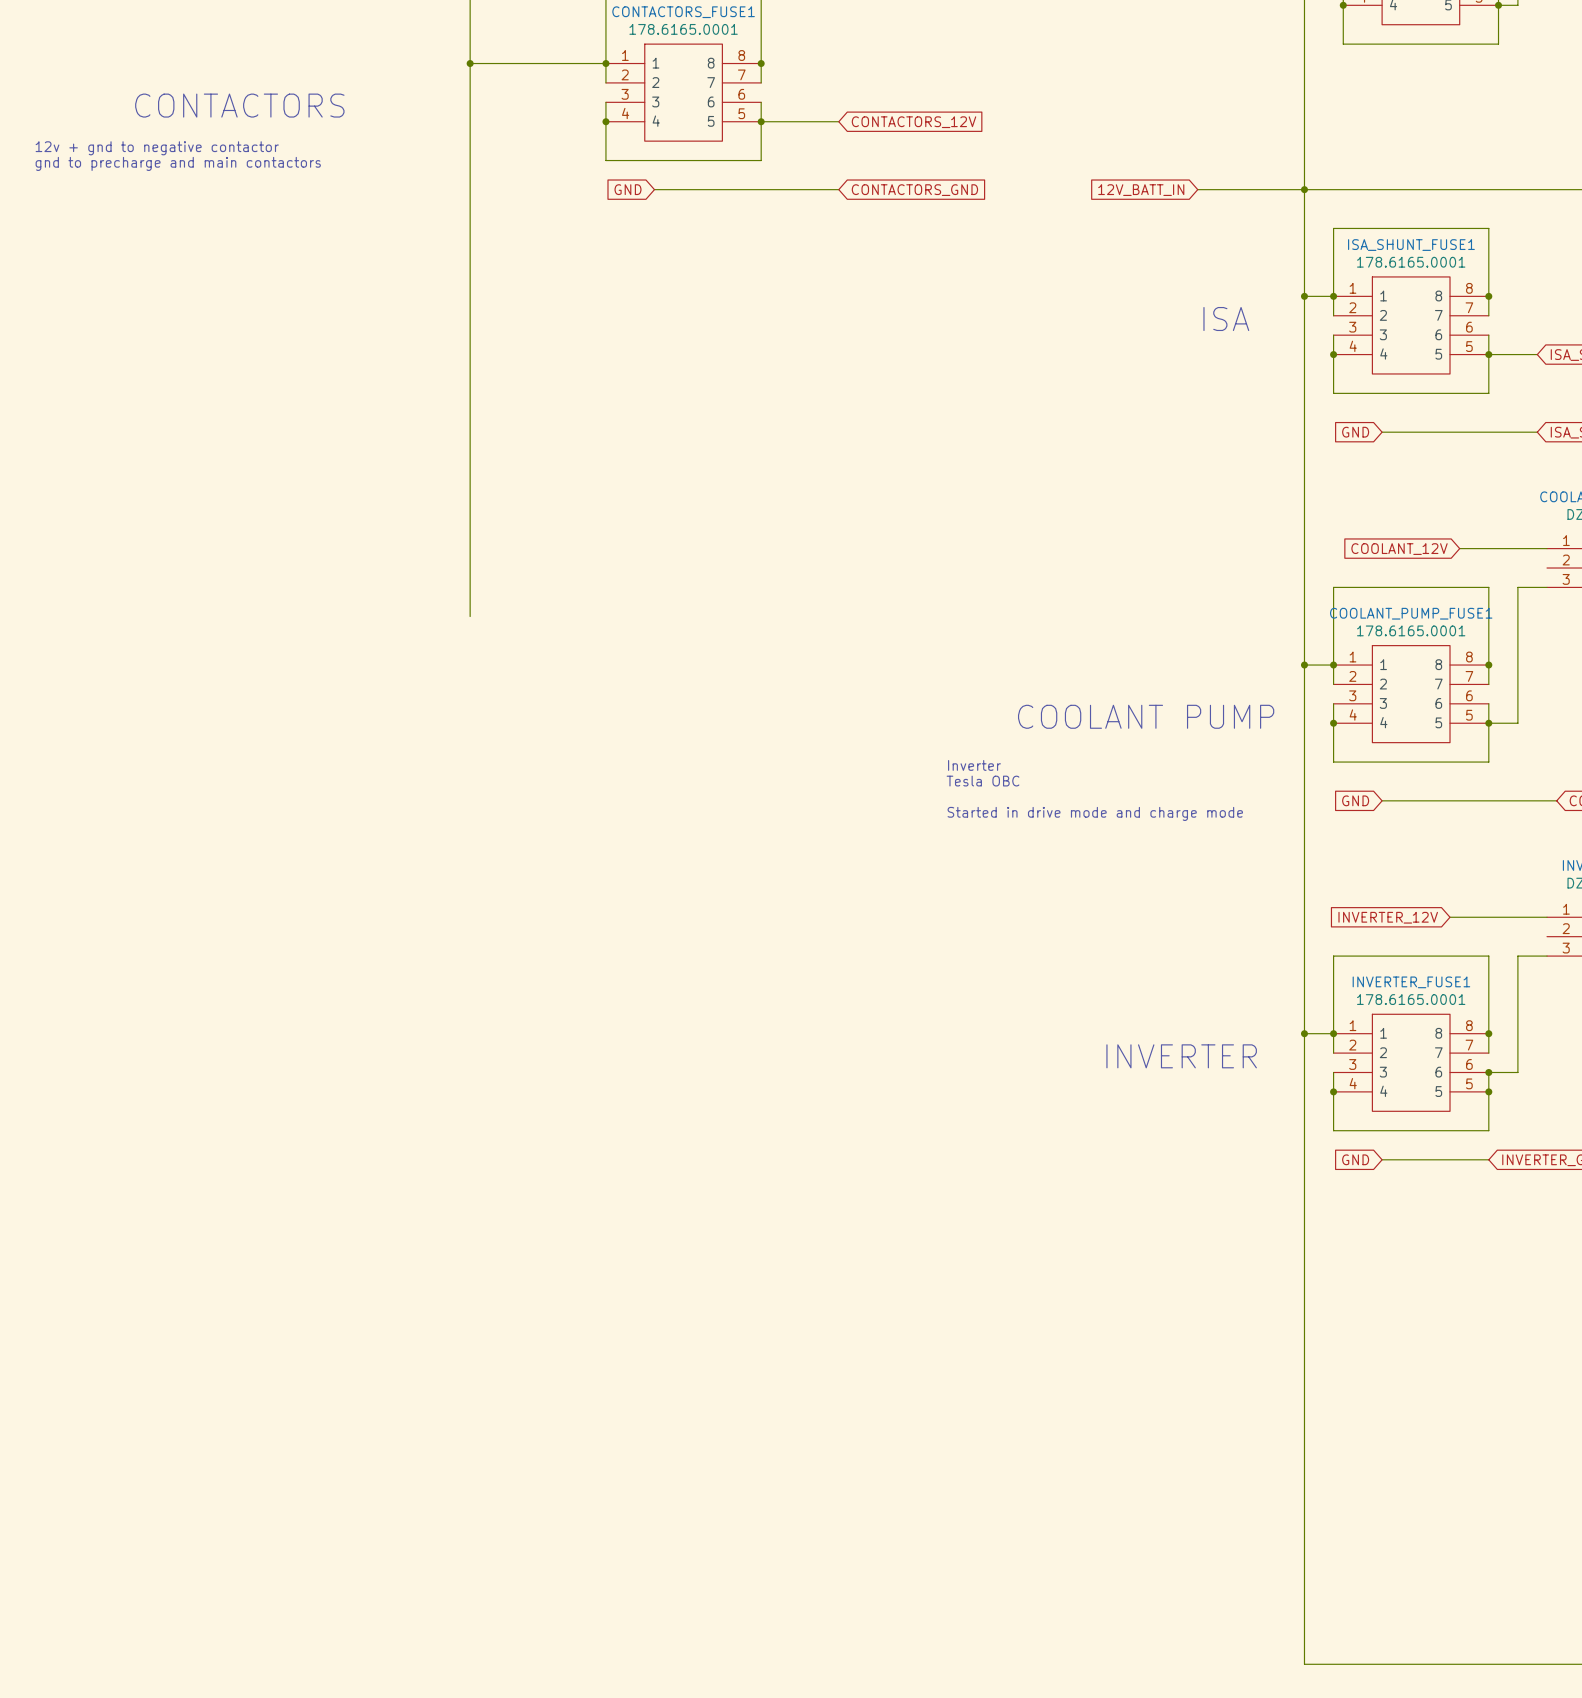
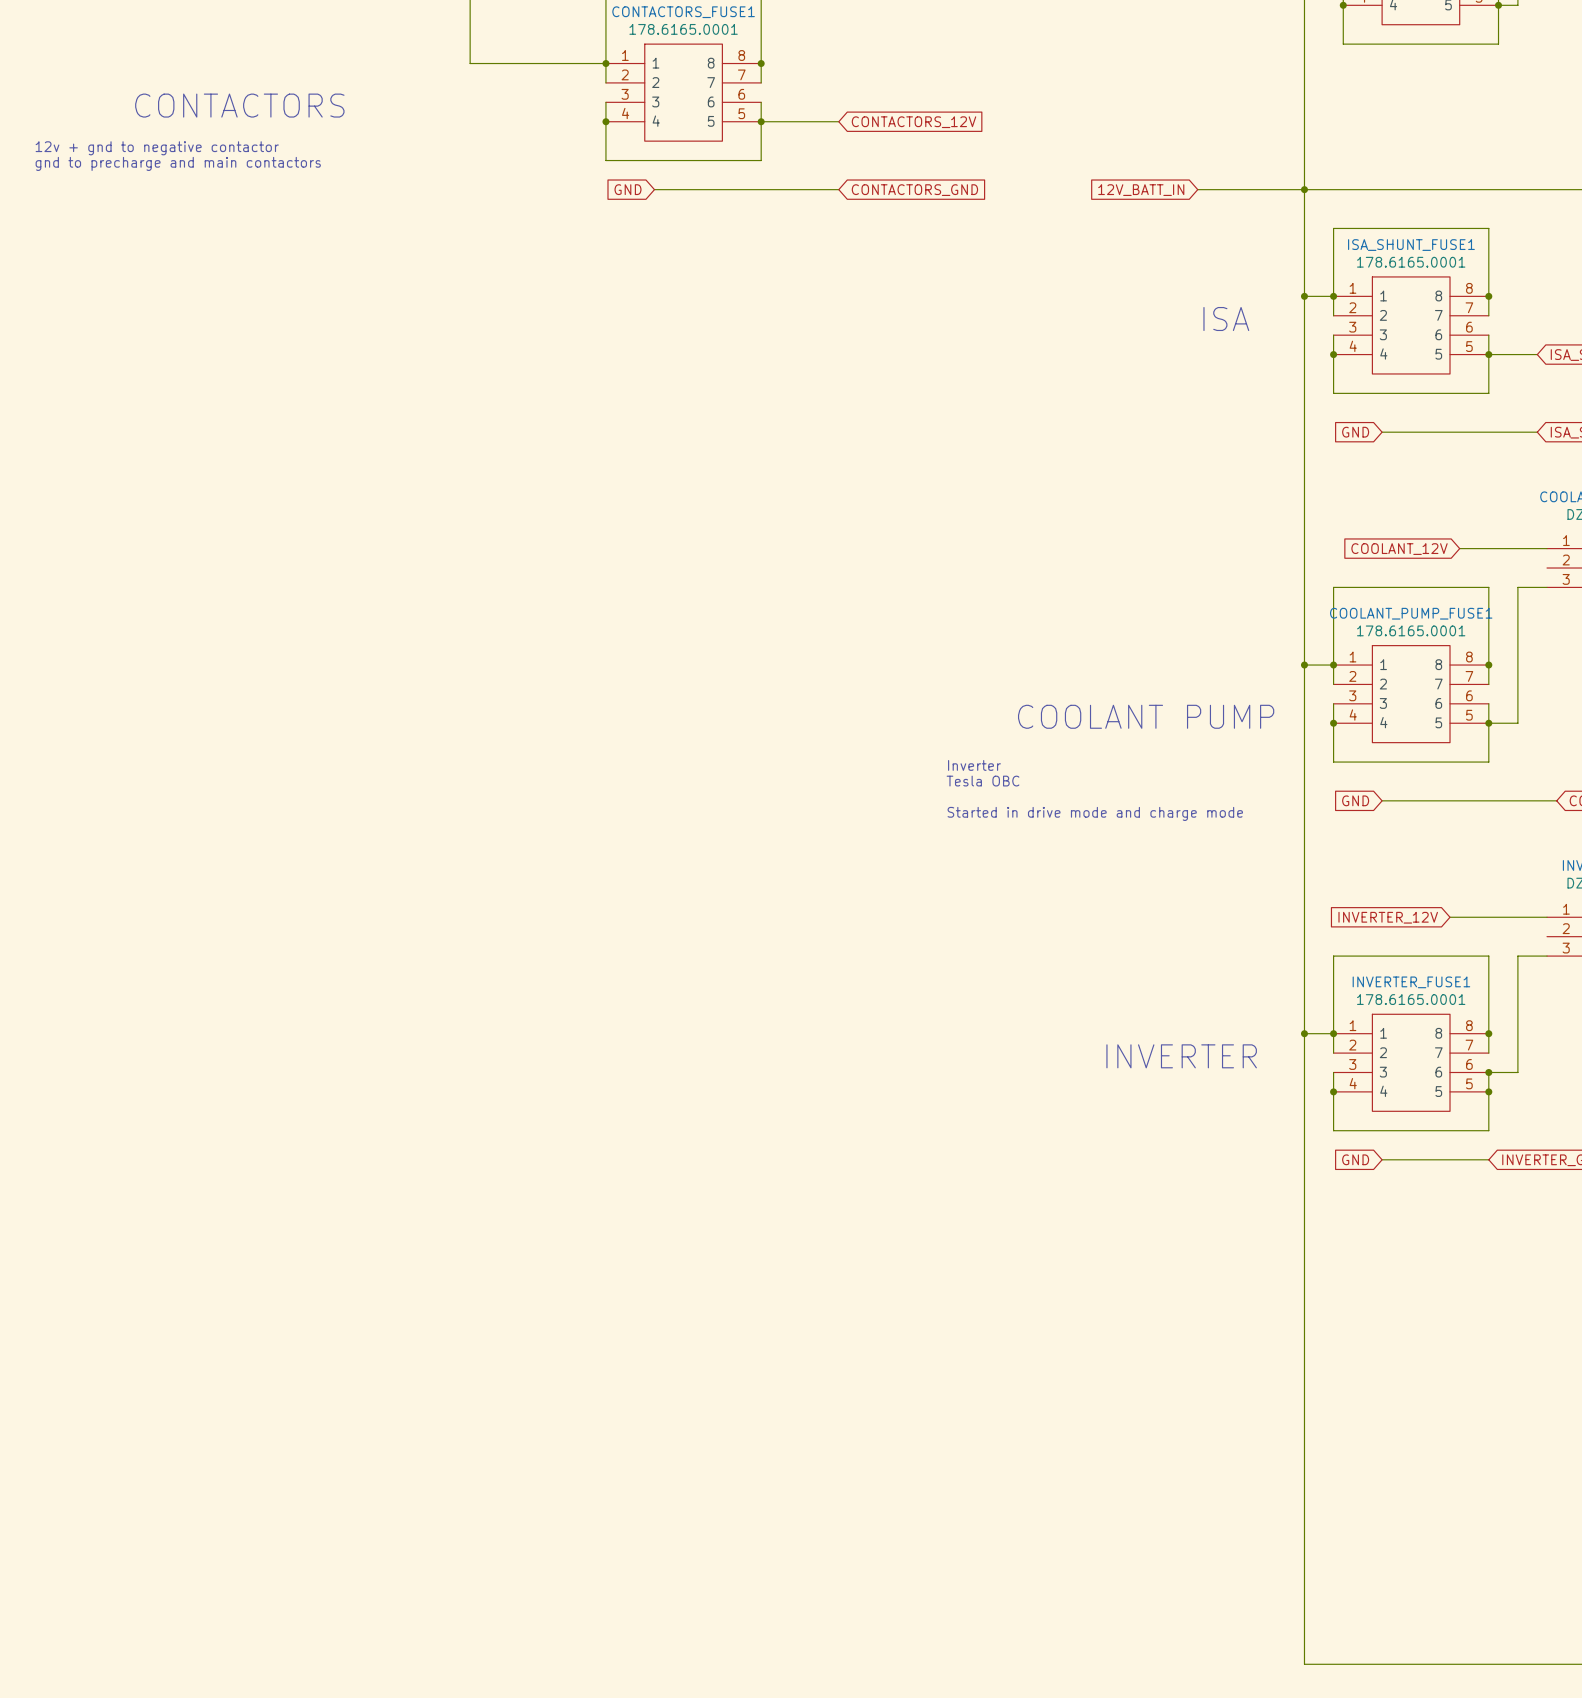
wire: (470, 63) (470, 616) -> none
junction: (470, 63) -> none

